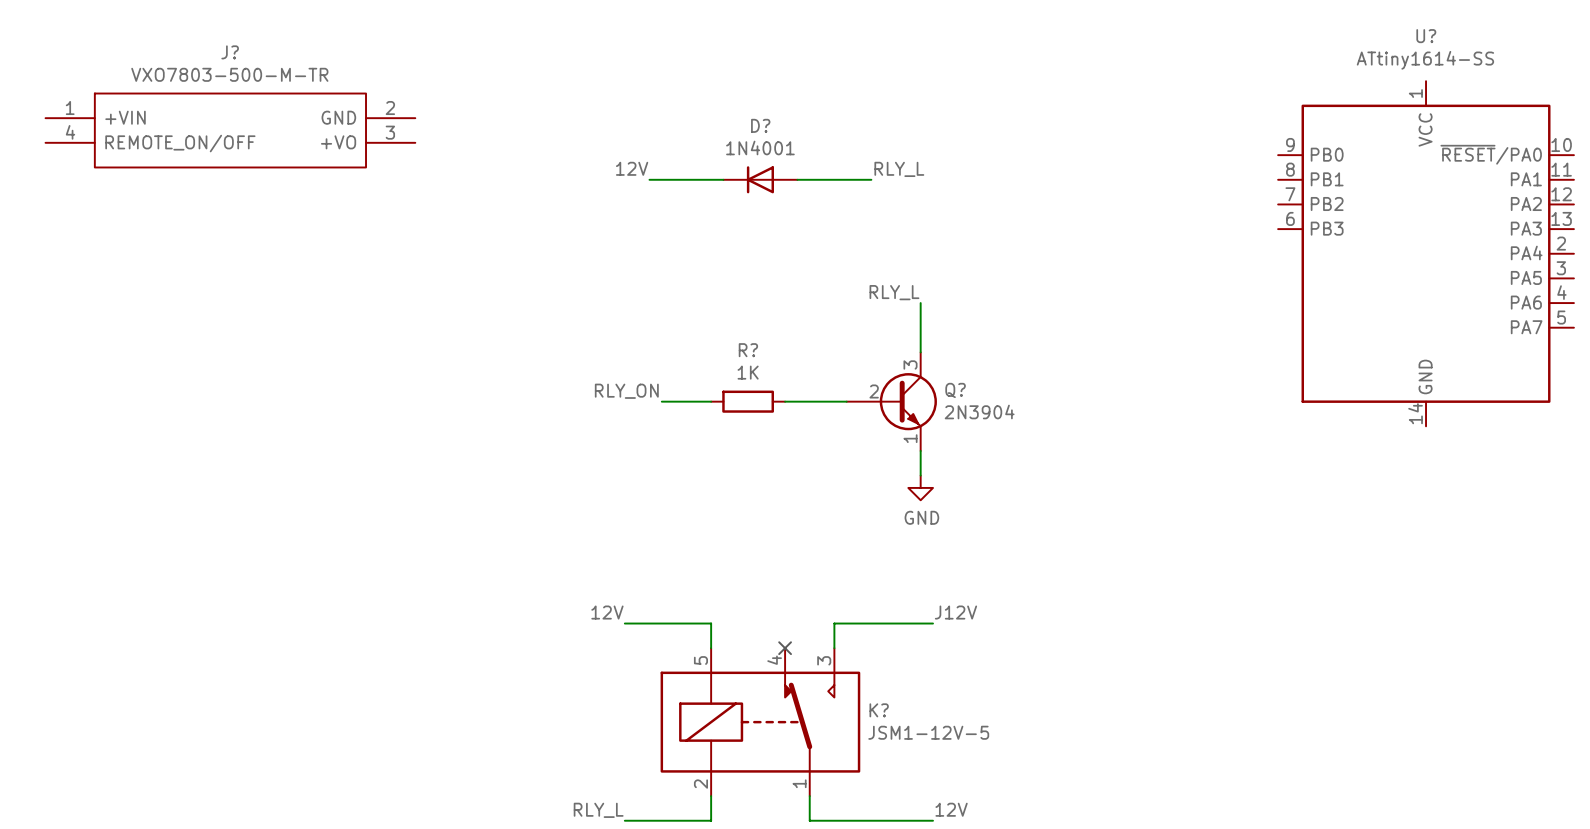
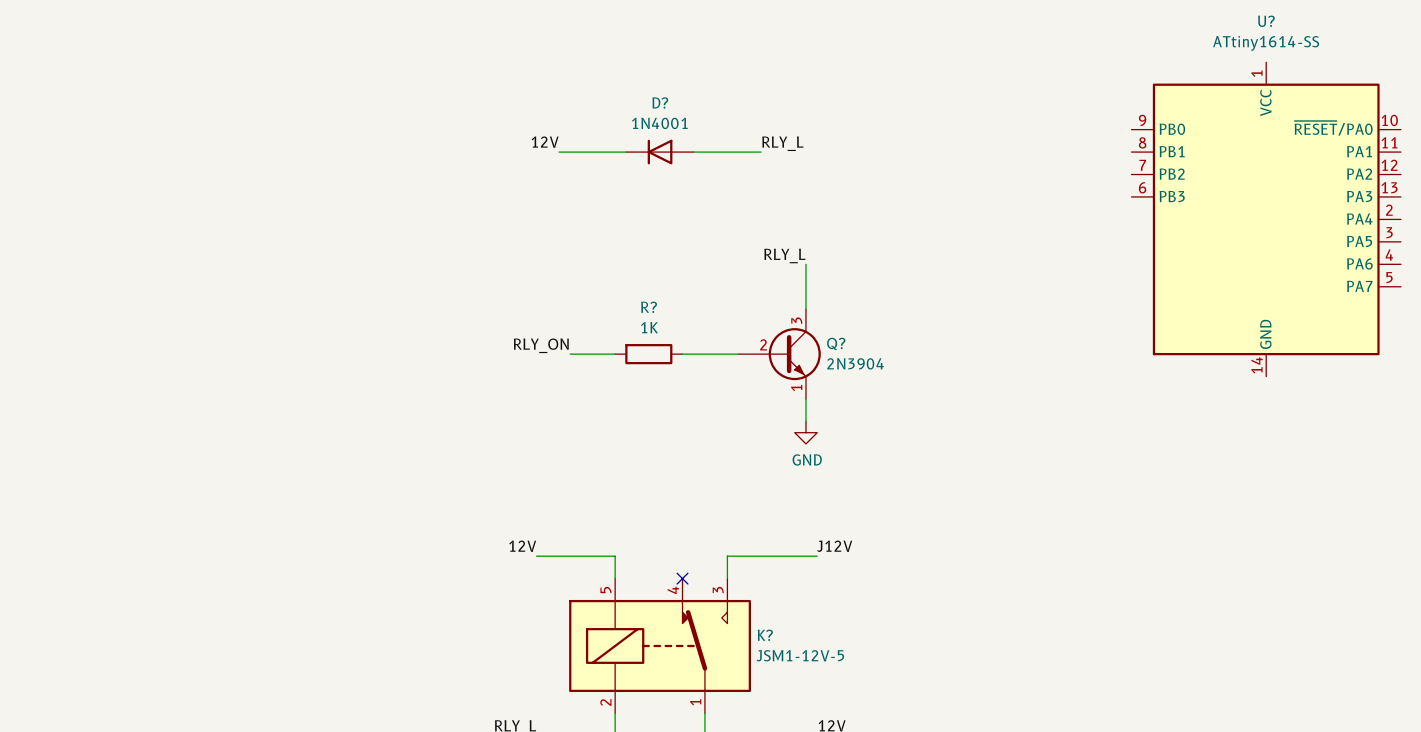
J?: VXO7803-500-M-TR (230, 130) -> none

